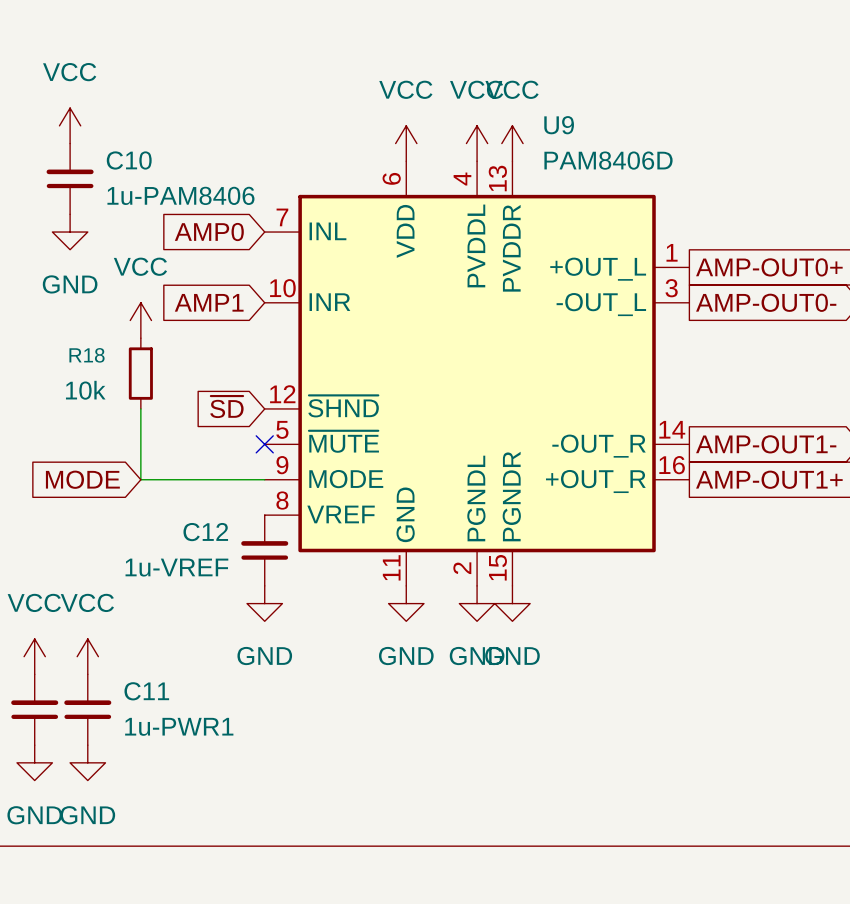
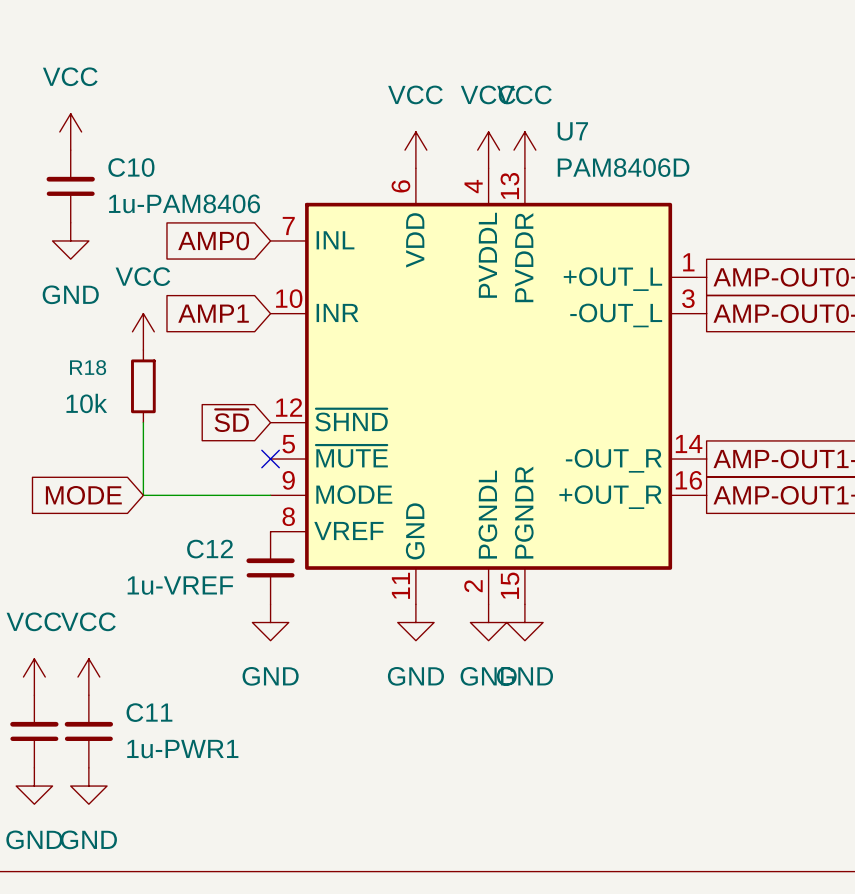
U9 name: U9 (559, 125) -> U7 (572, 131)

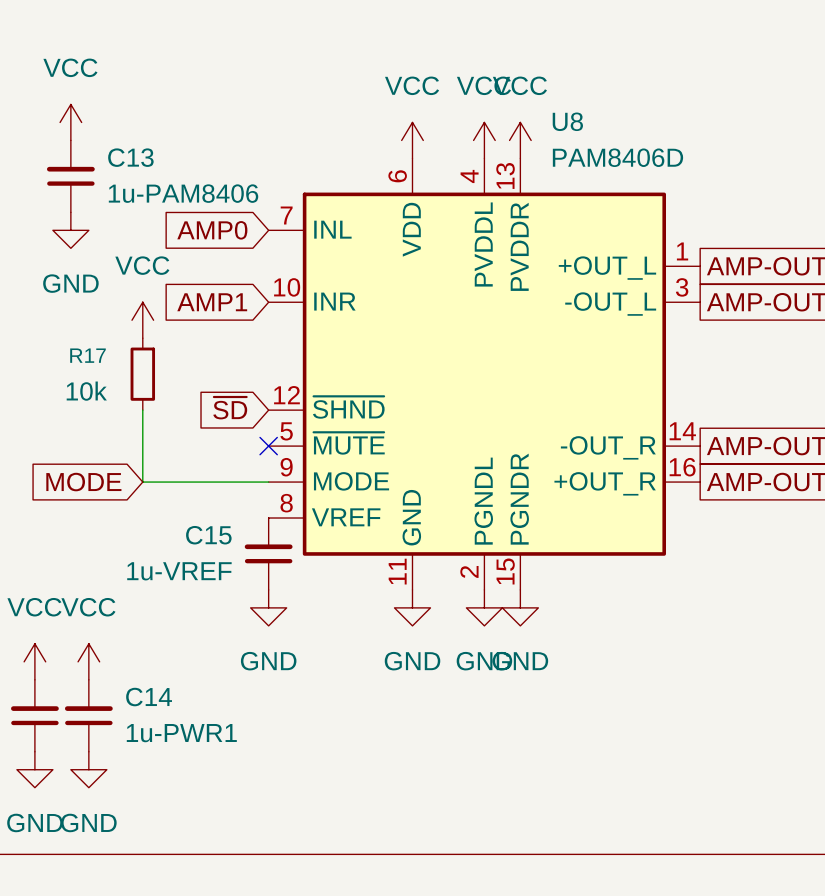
U7 name: U7 (572, 131) -> U8 (567, 121)
C10 name: C10 (131, 167) -> C13 (130, 157)
R18 name: R18 (88, 367) -> R17 (87, 355)
C12 name: C12 (210, 549) -> C15 (208, 535)
C11 name: C11 (149, 712) -> C14 (149, 697)

